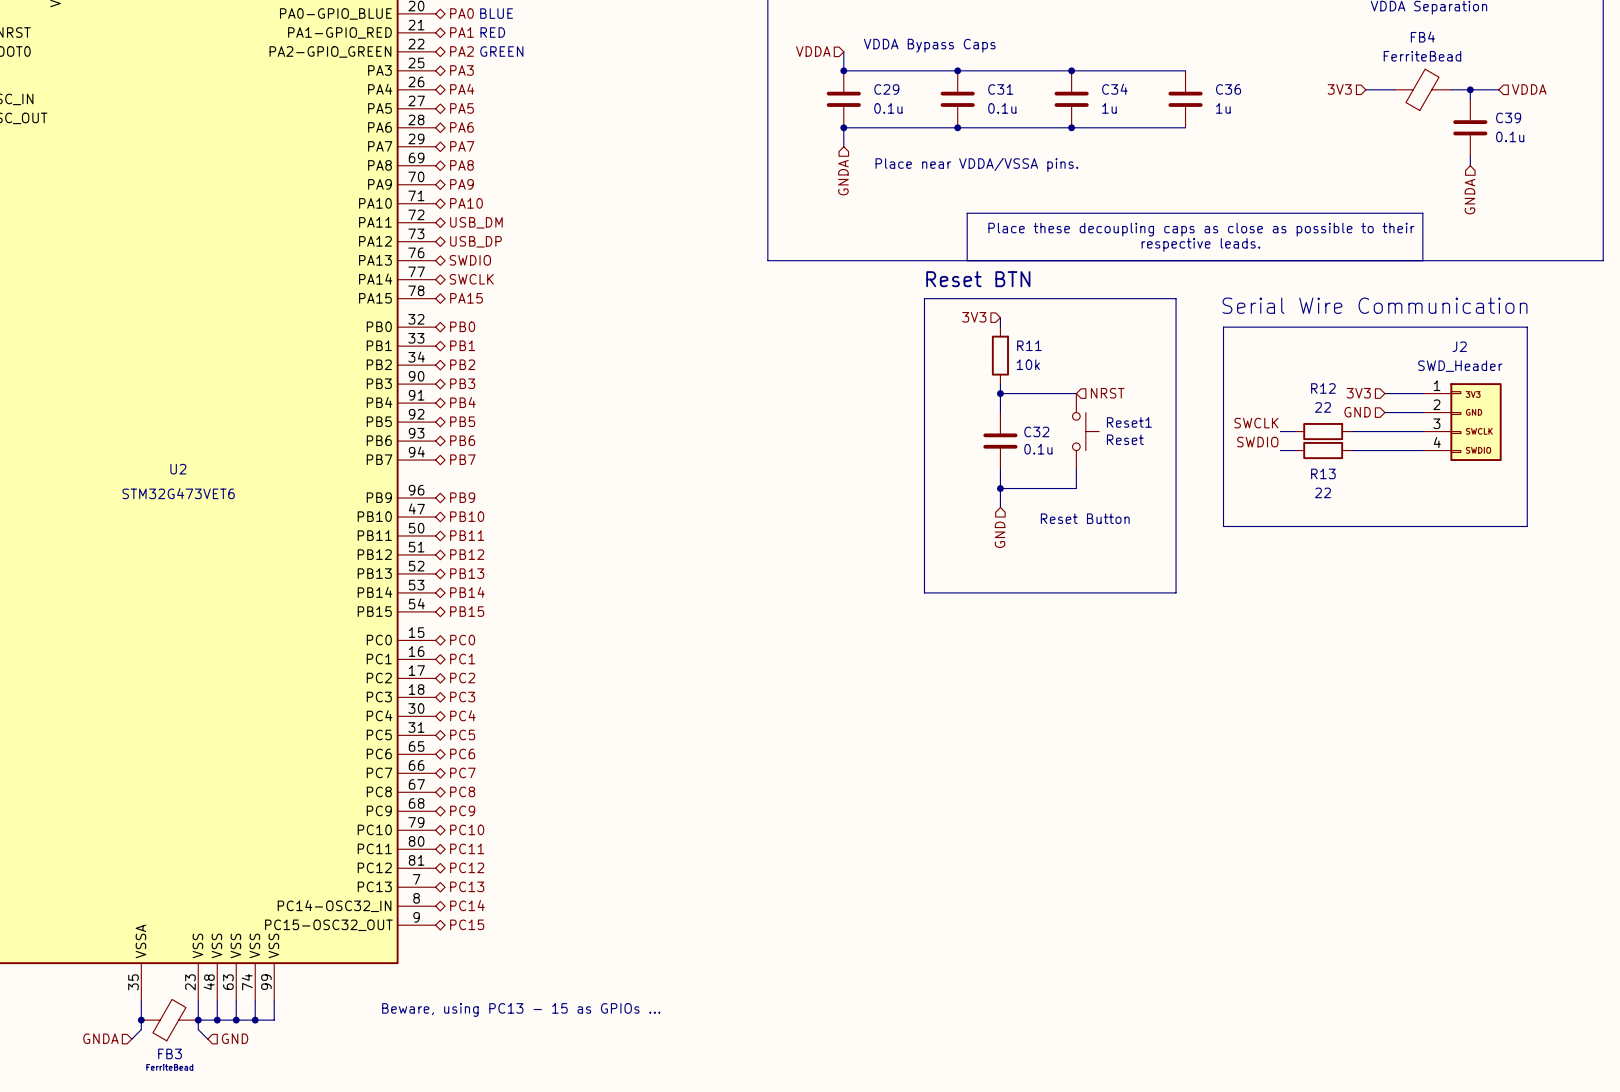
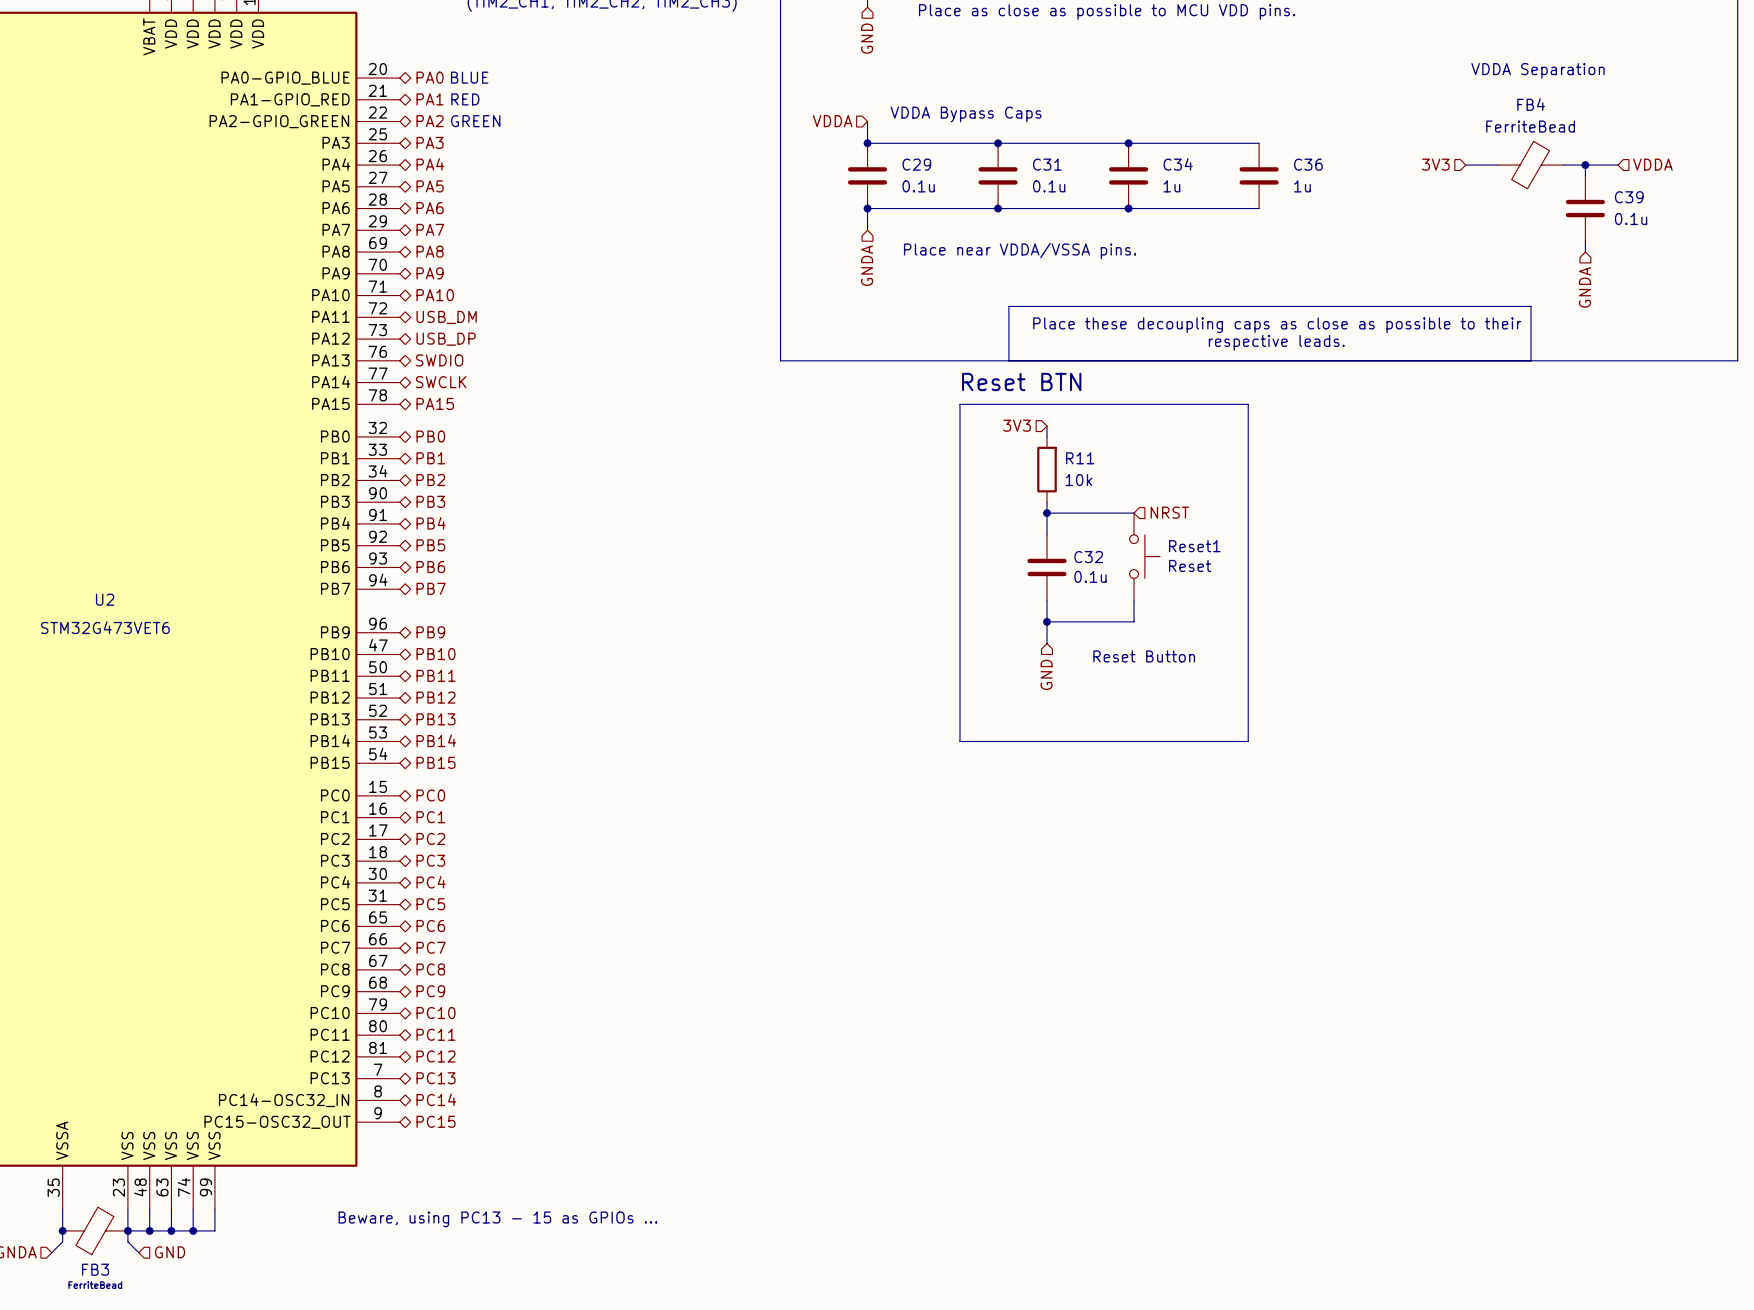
text: Serial Wire Communication (1375, 305) -> none
line: (1223, 327) (1527, 327) (1527, 526) (1223, 526) (1223, 327) -> none
hierarchical label: 3V3 (1358, 393) -> none
wire: (1384, 393) (1422, 393) -> none
hierarchical label: GND (1357, 412) -> none
wire: (1384, 412) (1422, 412) -> none
J2: SWD_Header (1462, 422) -> none
label: SWCLK (1256, 423) -> none
wire: (1280, 431) (1294, 431) -> none
R12: 22 (1323, 431) -> none
wire: (1351, 431) (1422, 431) -> none
label: SWDIO (1257, 442) -> none
wire: (1280, 450) (1294, 450) -> none
R13: 22 (1323, 450) -> none
wire: (1351, 450) (1422, 450) -> none

